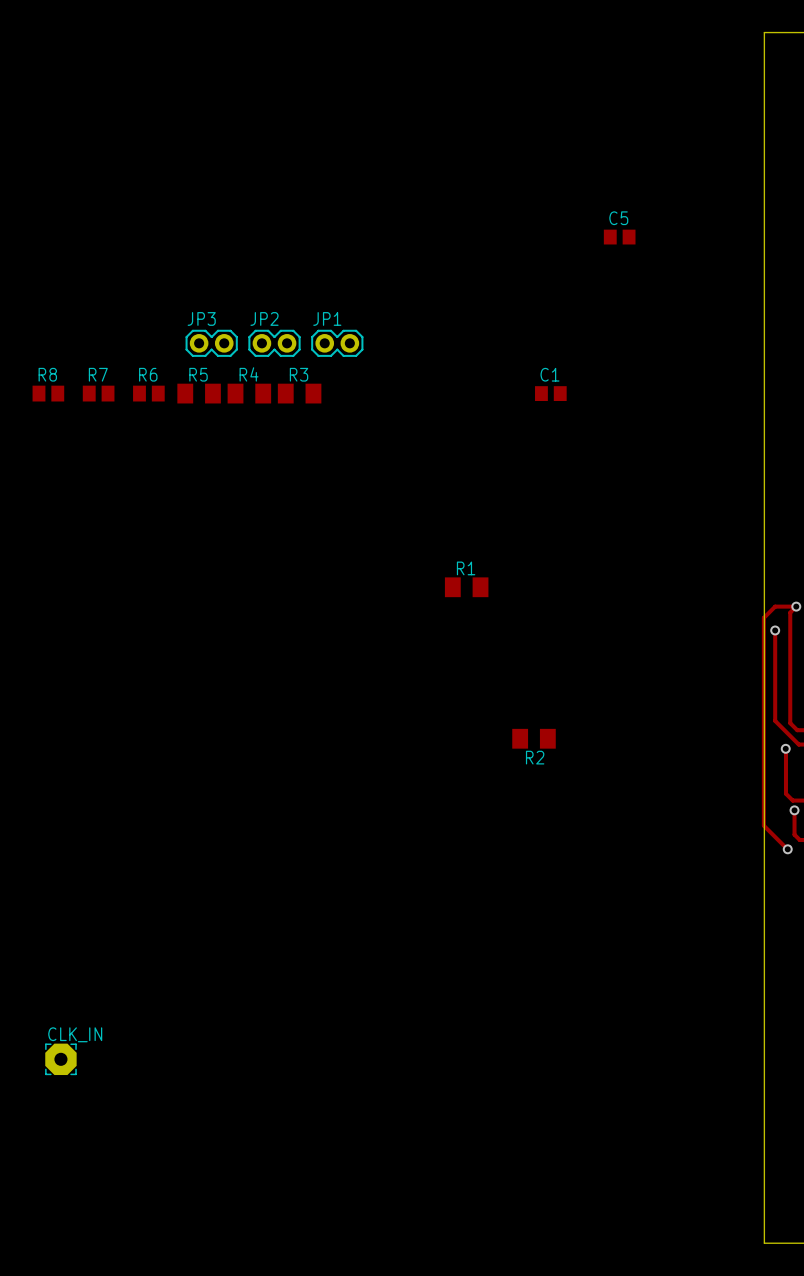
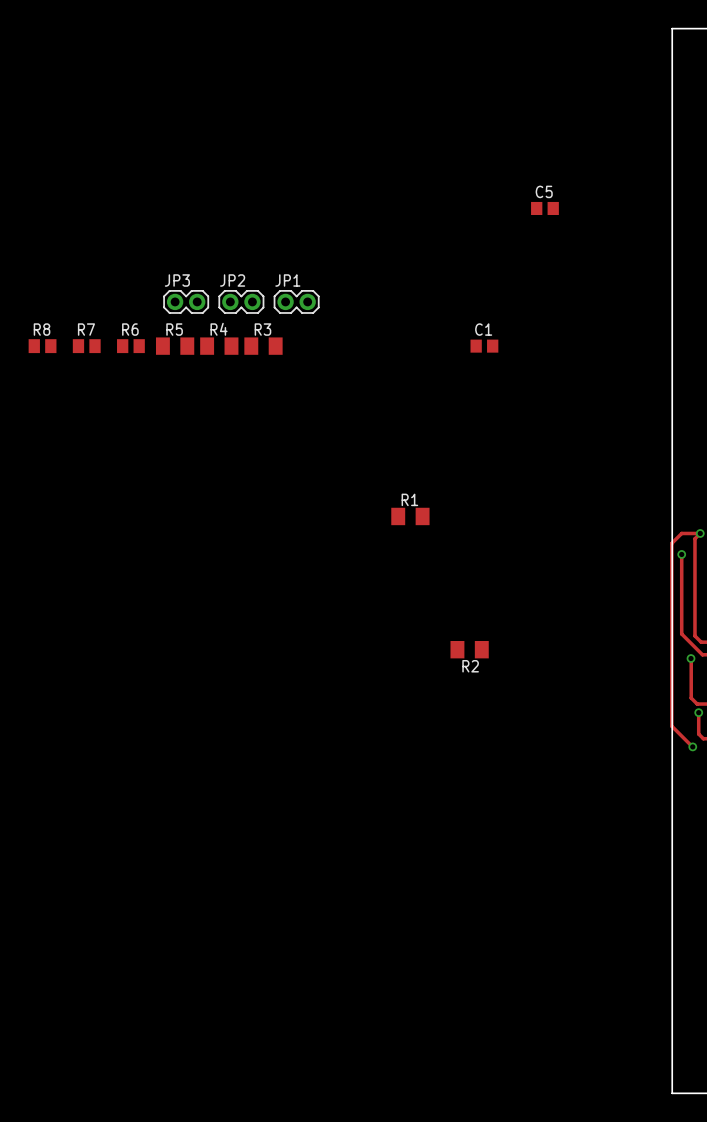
CLK_IN: (60, 1059) -> none

